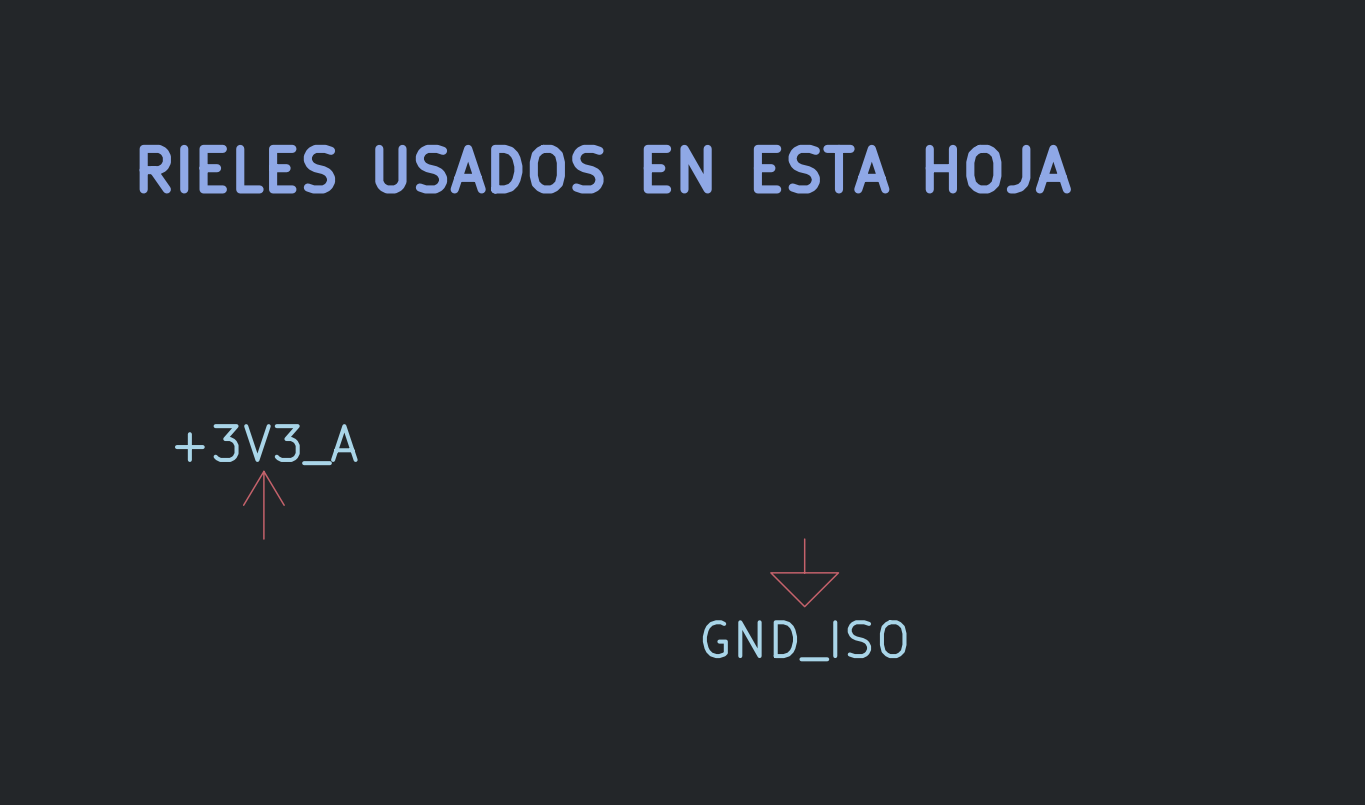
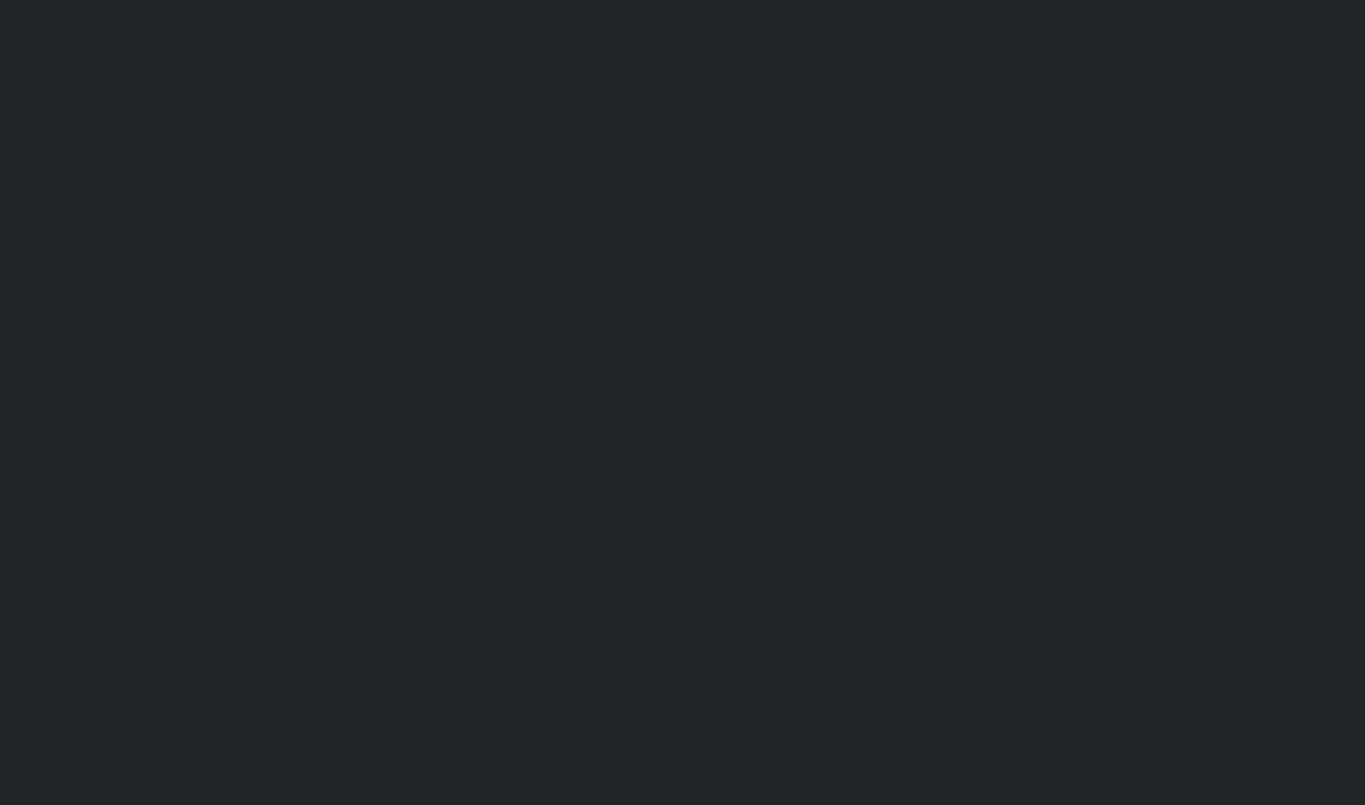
text: RIELES USADOS EN ESTA HOJA (605, 169) -> none
power symbol: +3V3_A (263, 505) -> none
power symbol: GND_ISO (804, 572) -> none

